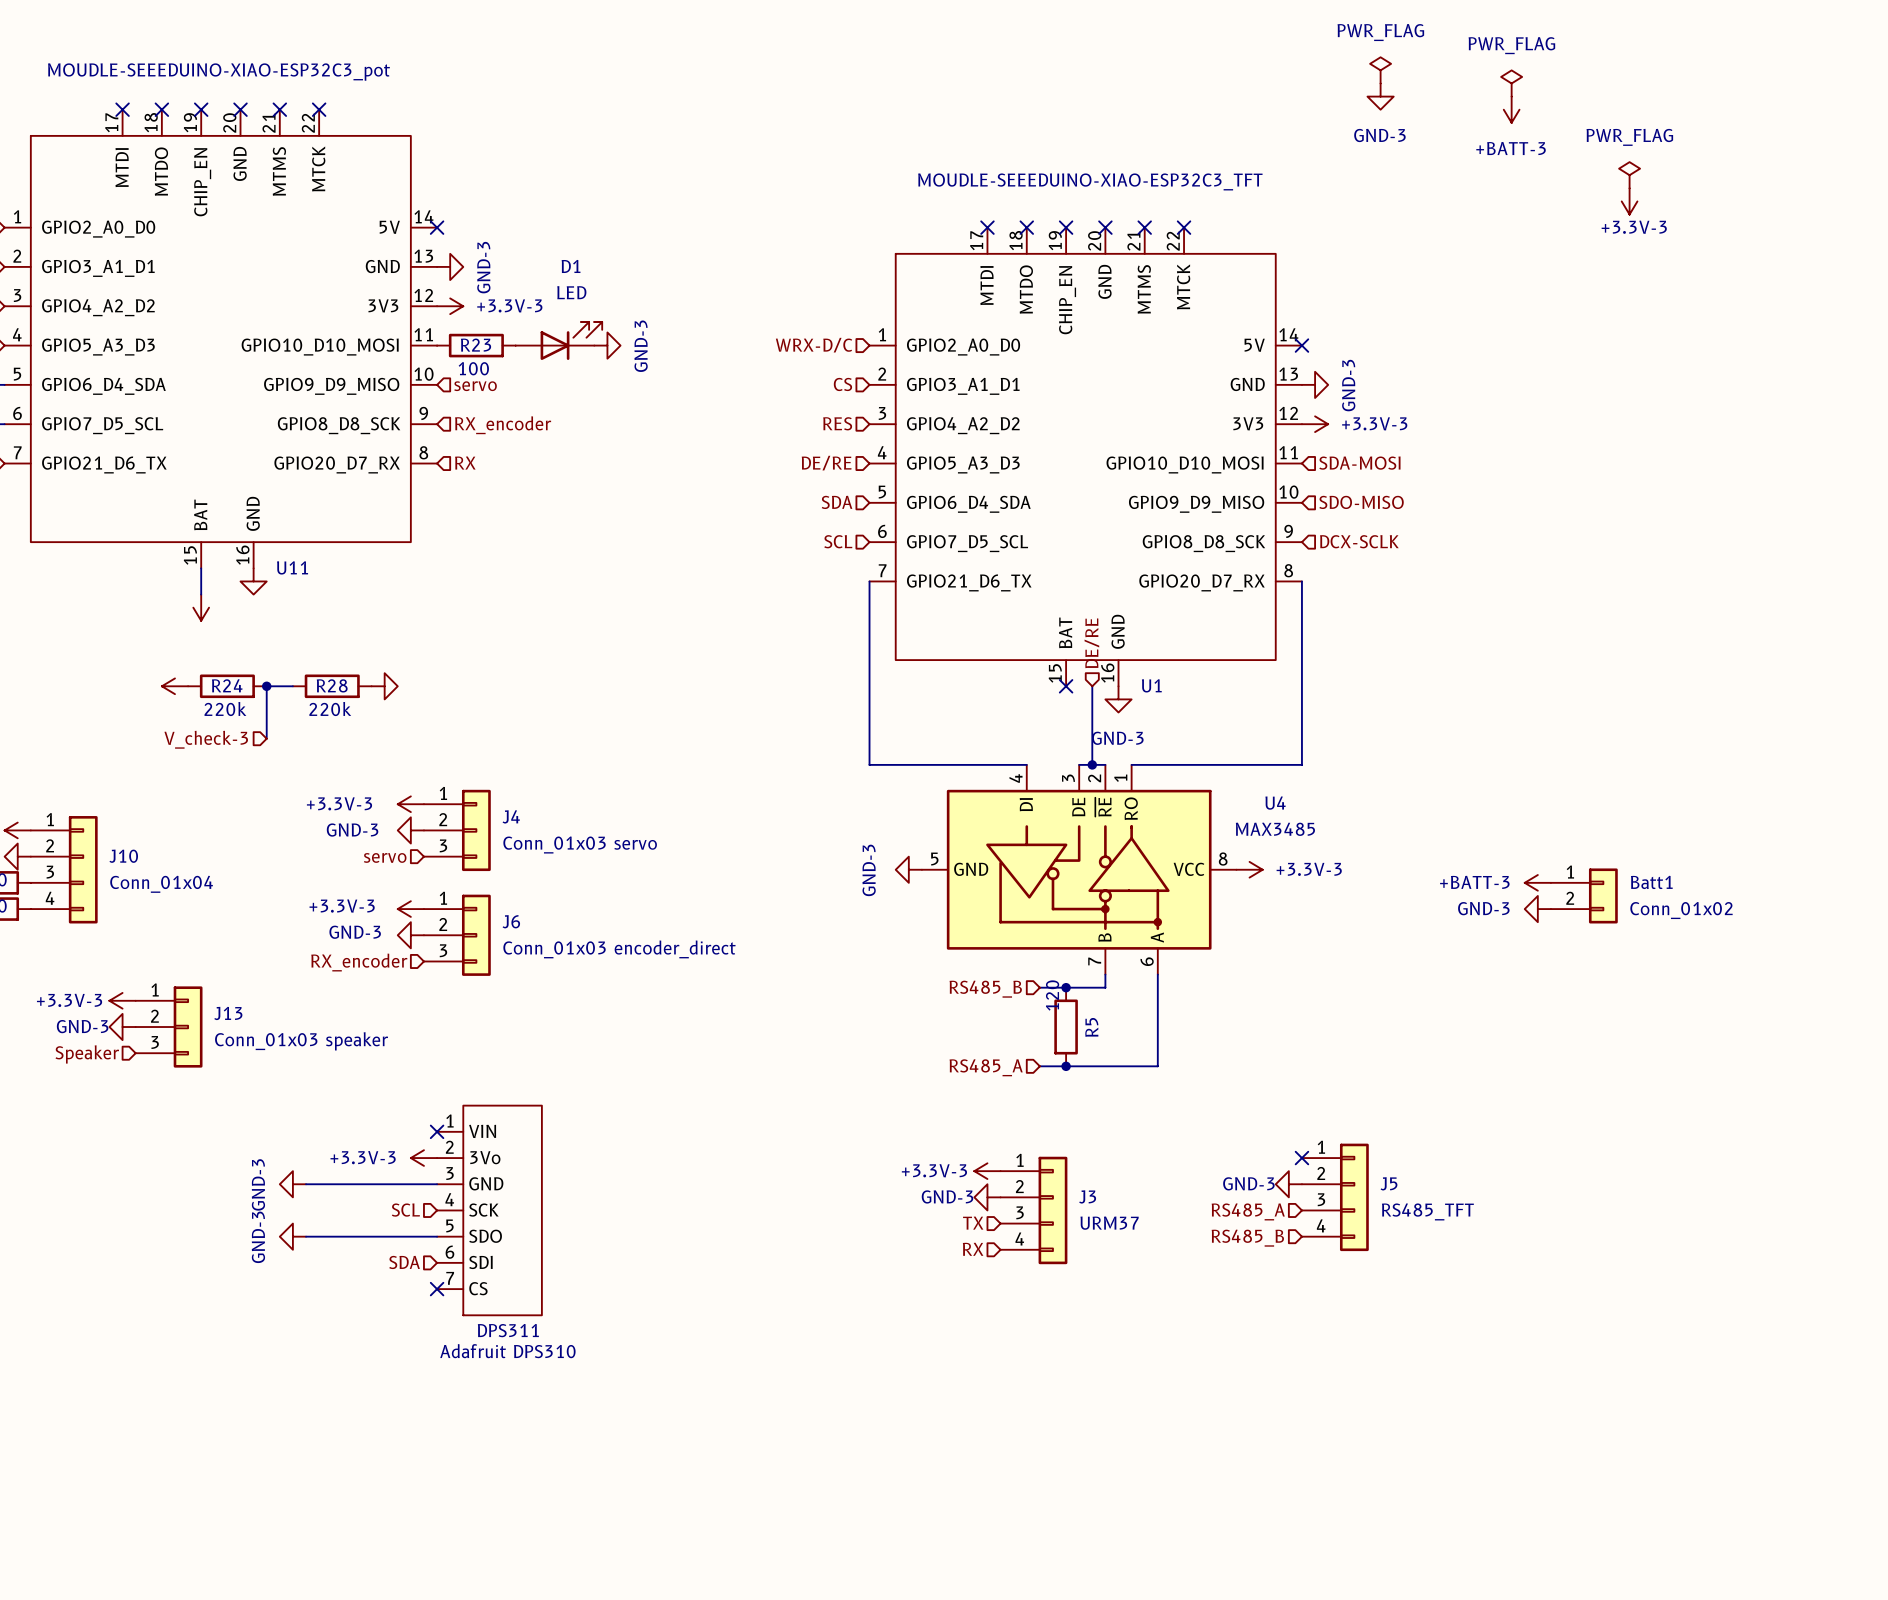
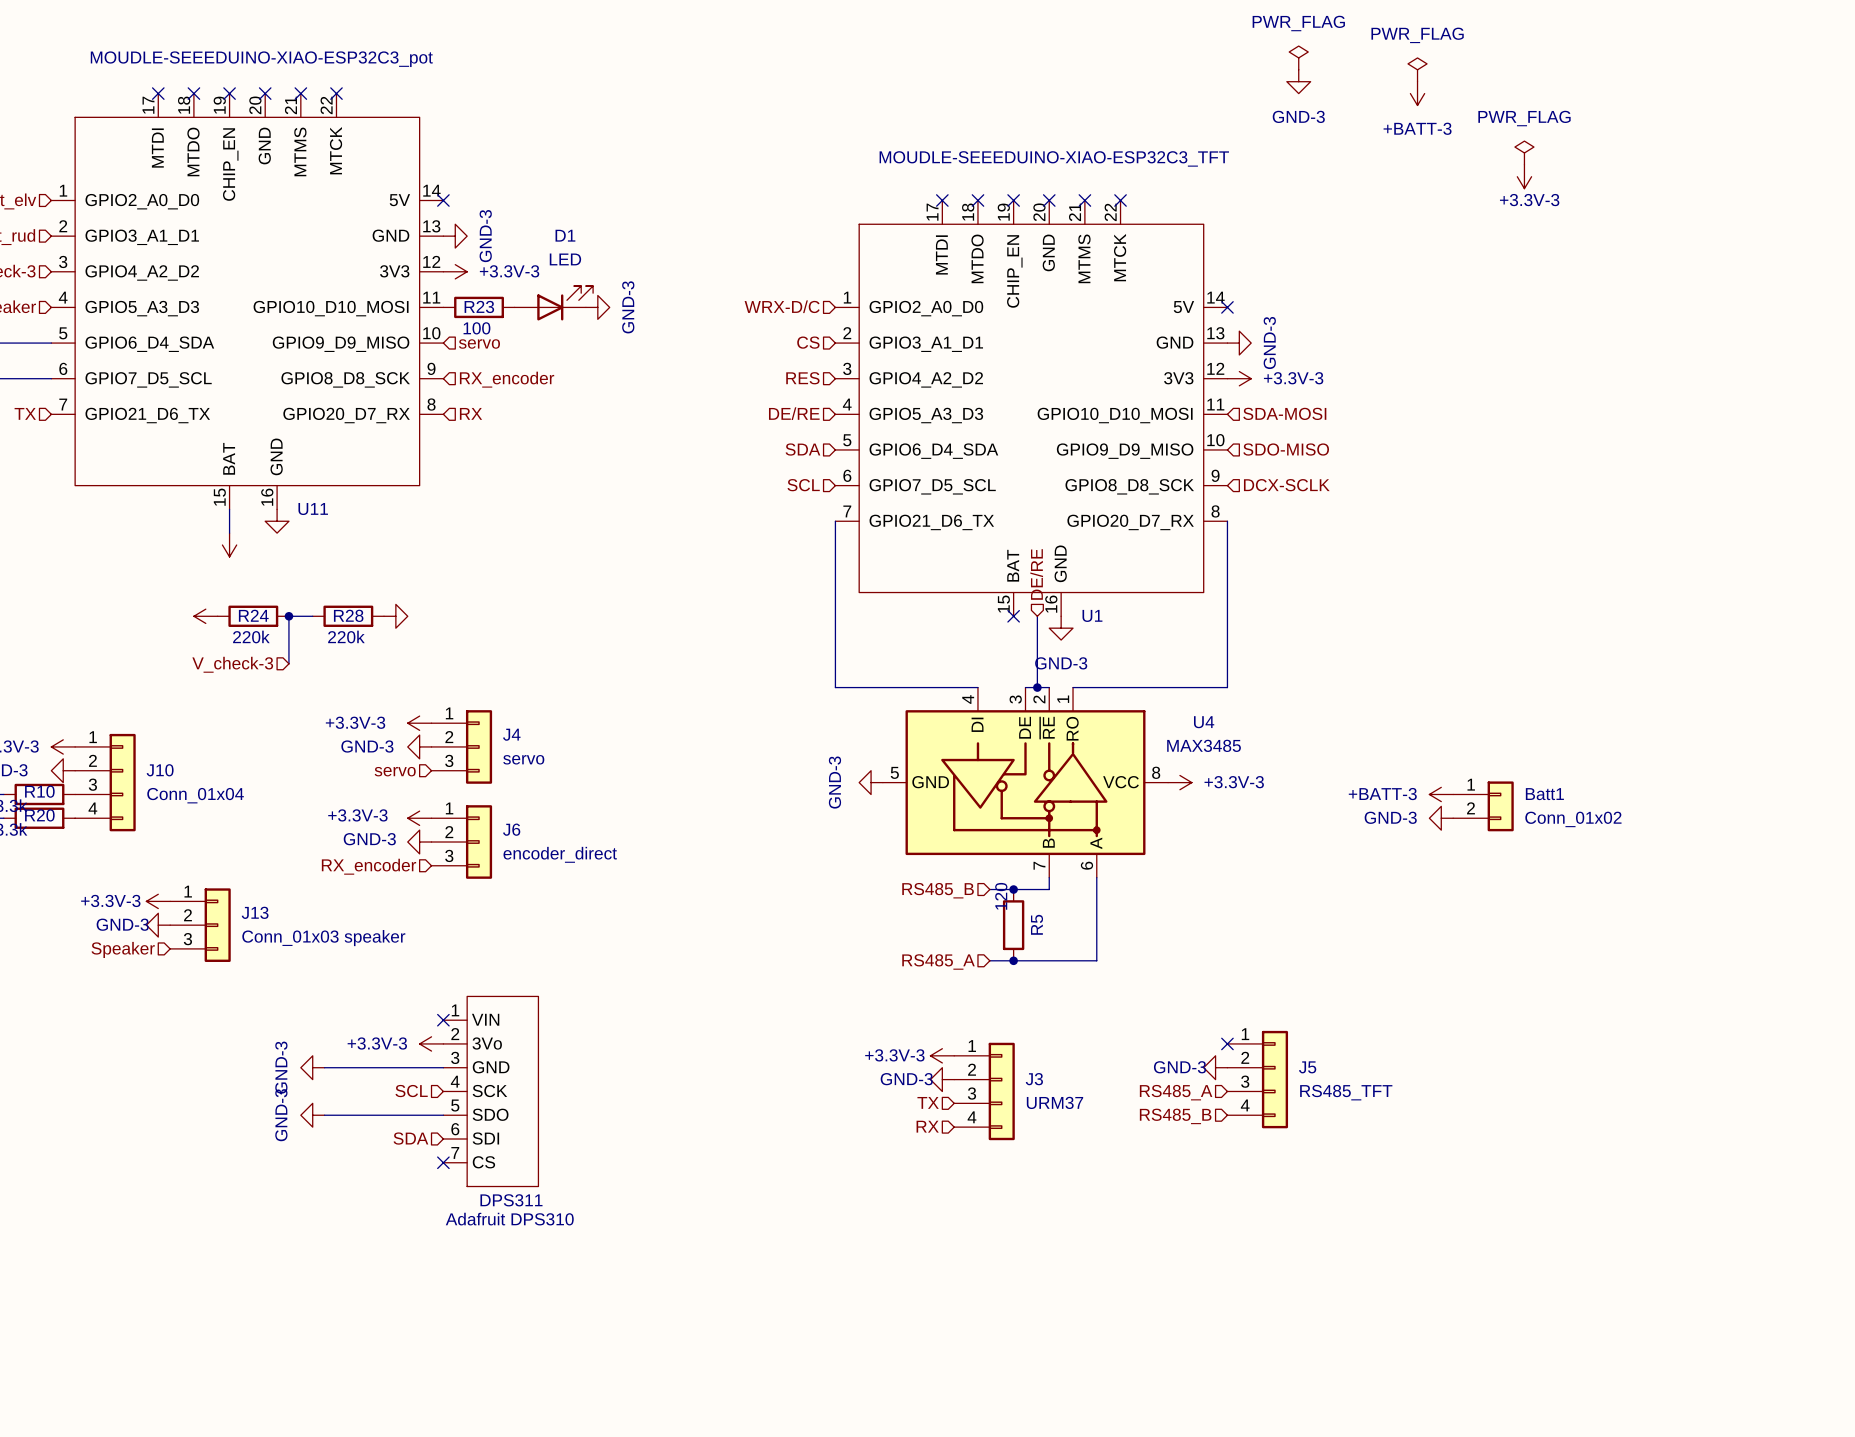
J4 value: Conn_01x03 servo (580, 845) -> servo (523, 759)
J6 value: Conn_01x03 encoder_direct (619, 949) -> encoder_direct (560, 854)

